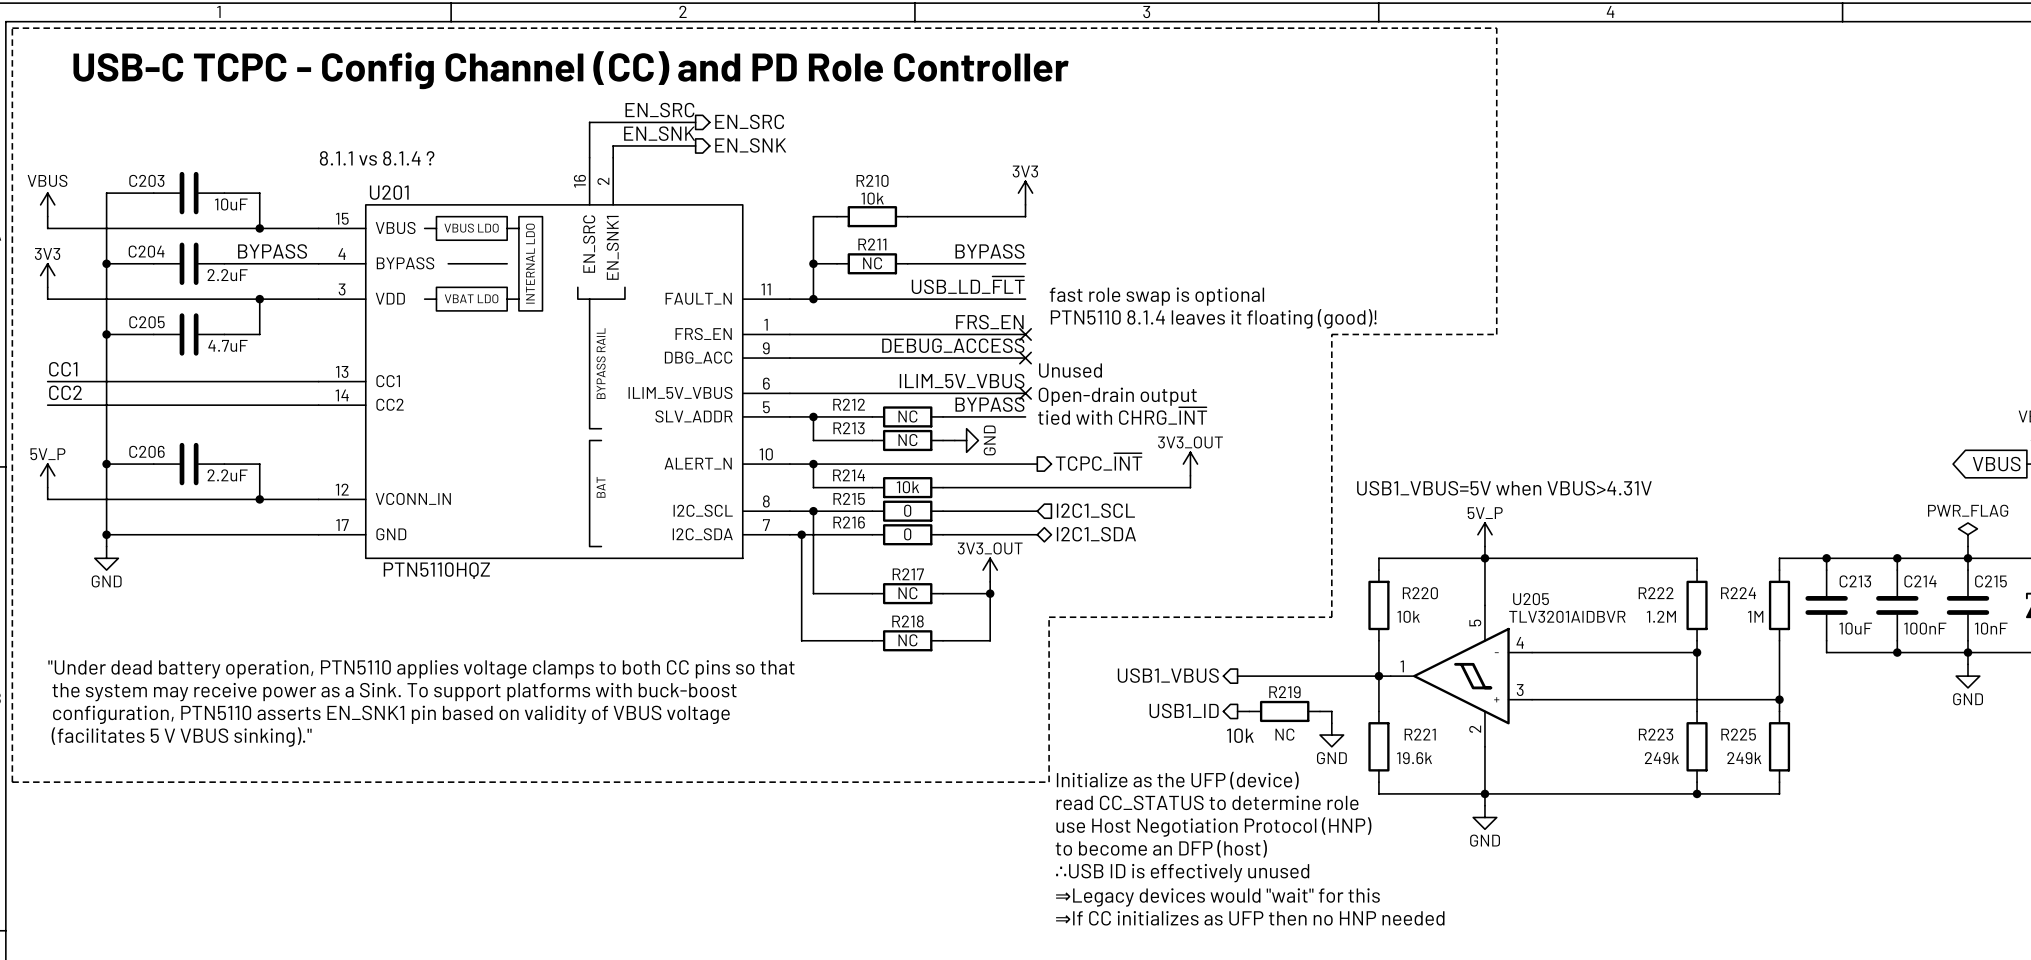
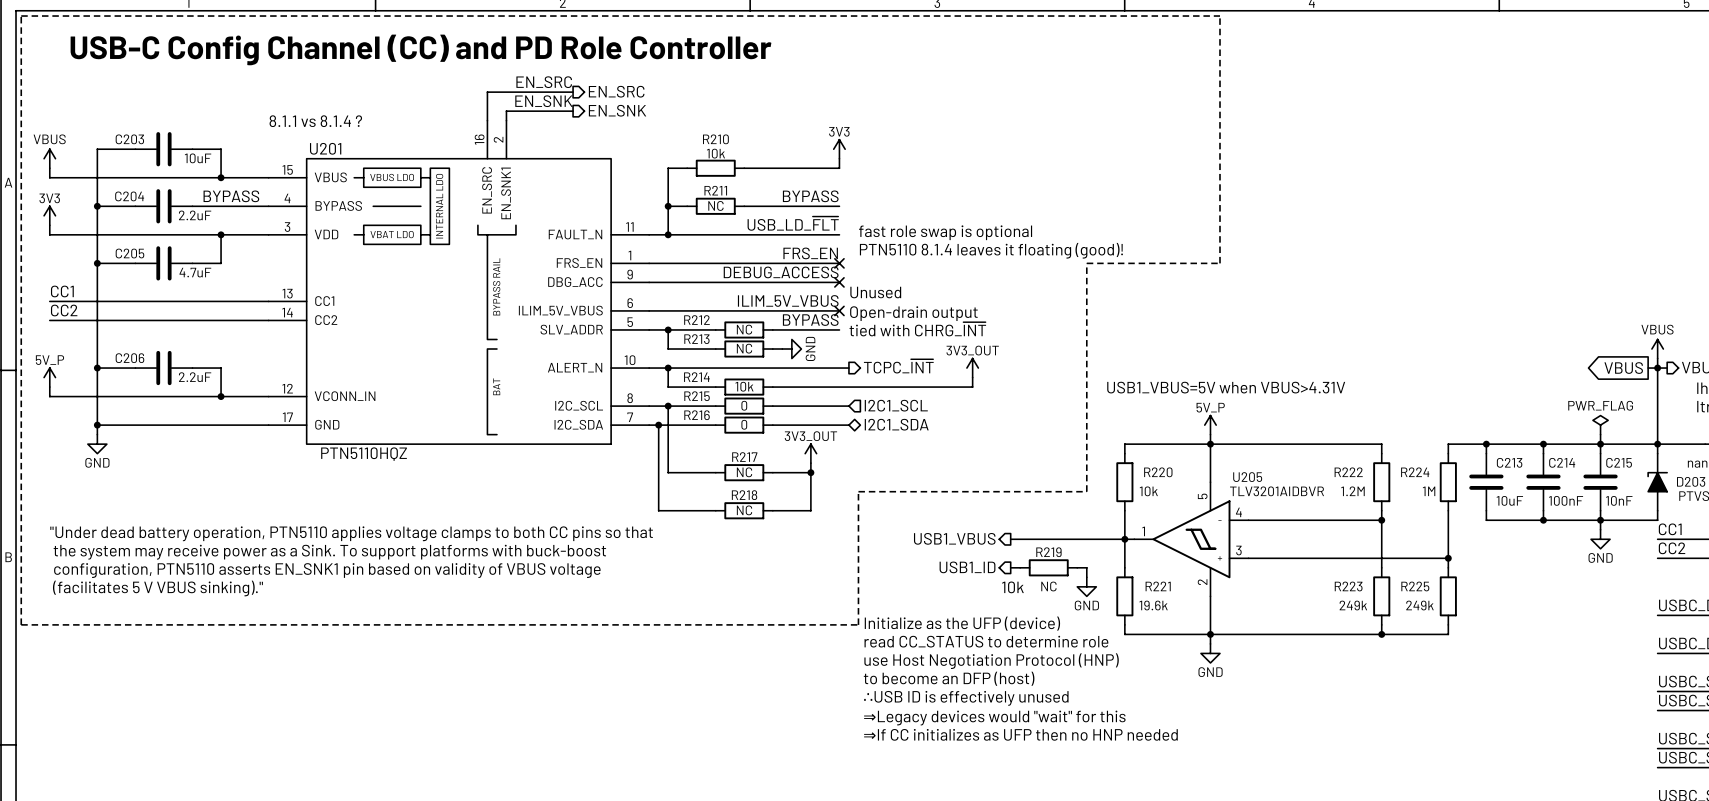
text: USB-C TCPC - Config Channel (CC) and PD Role Controller (571, 70) -> USB-C Config Channel (CC) and PD Role Controller (421, 49)

